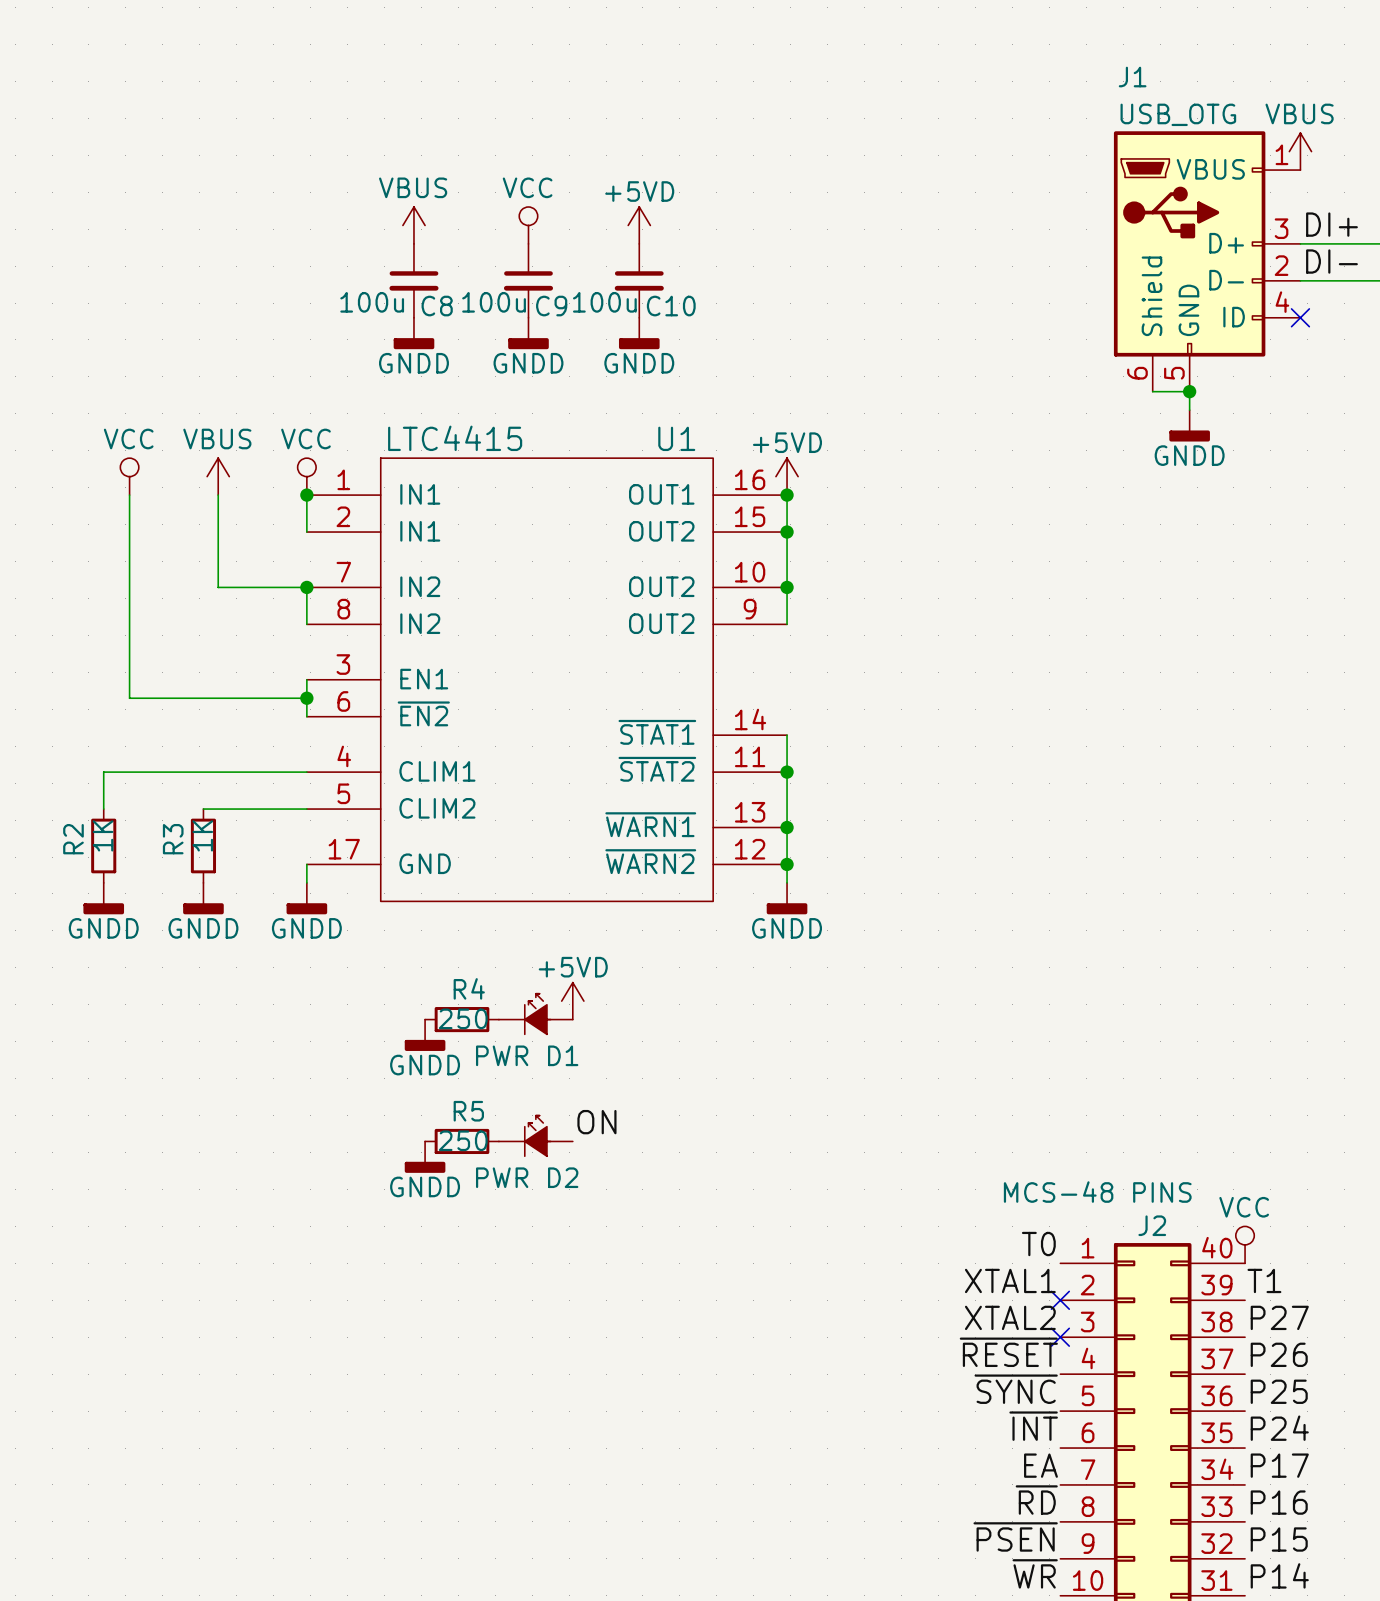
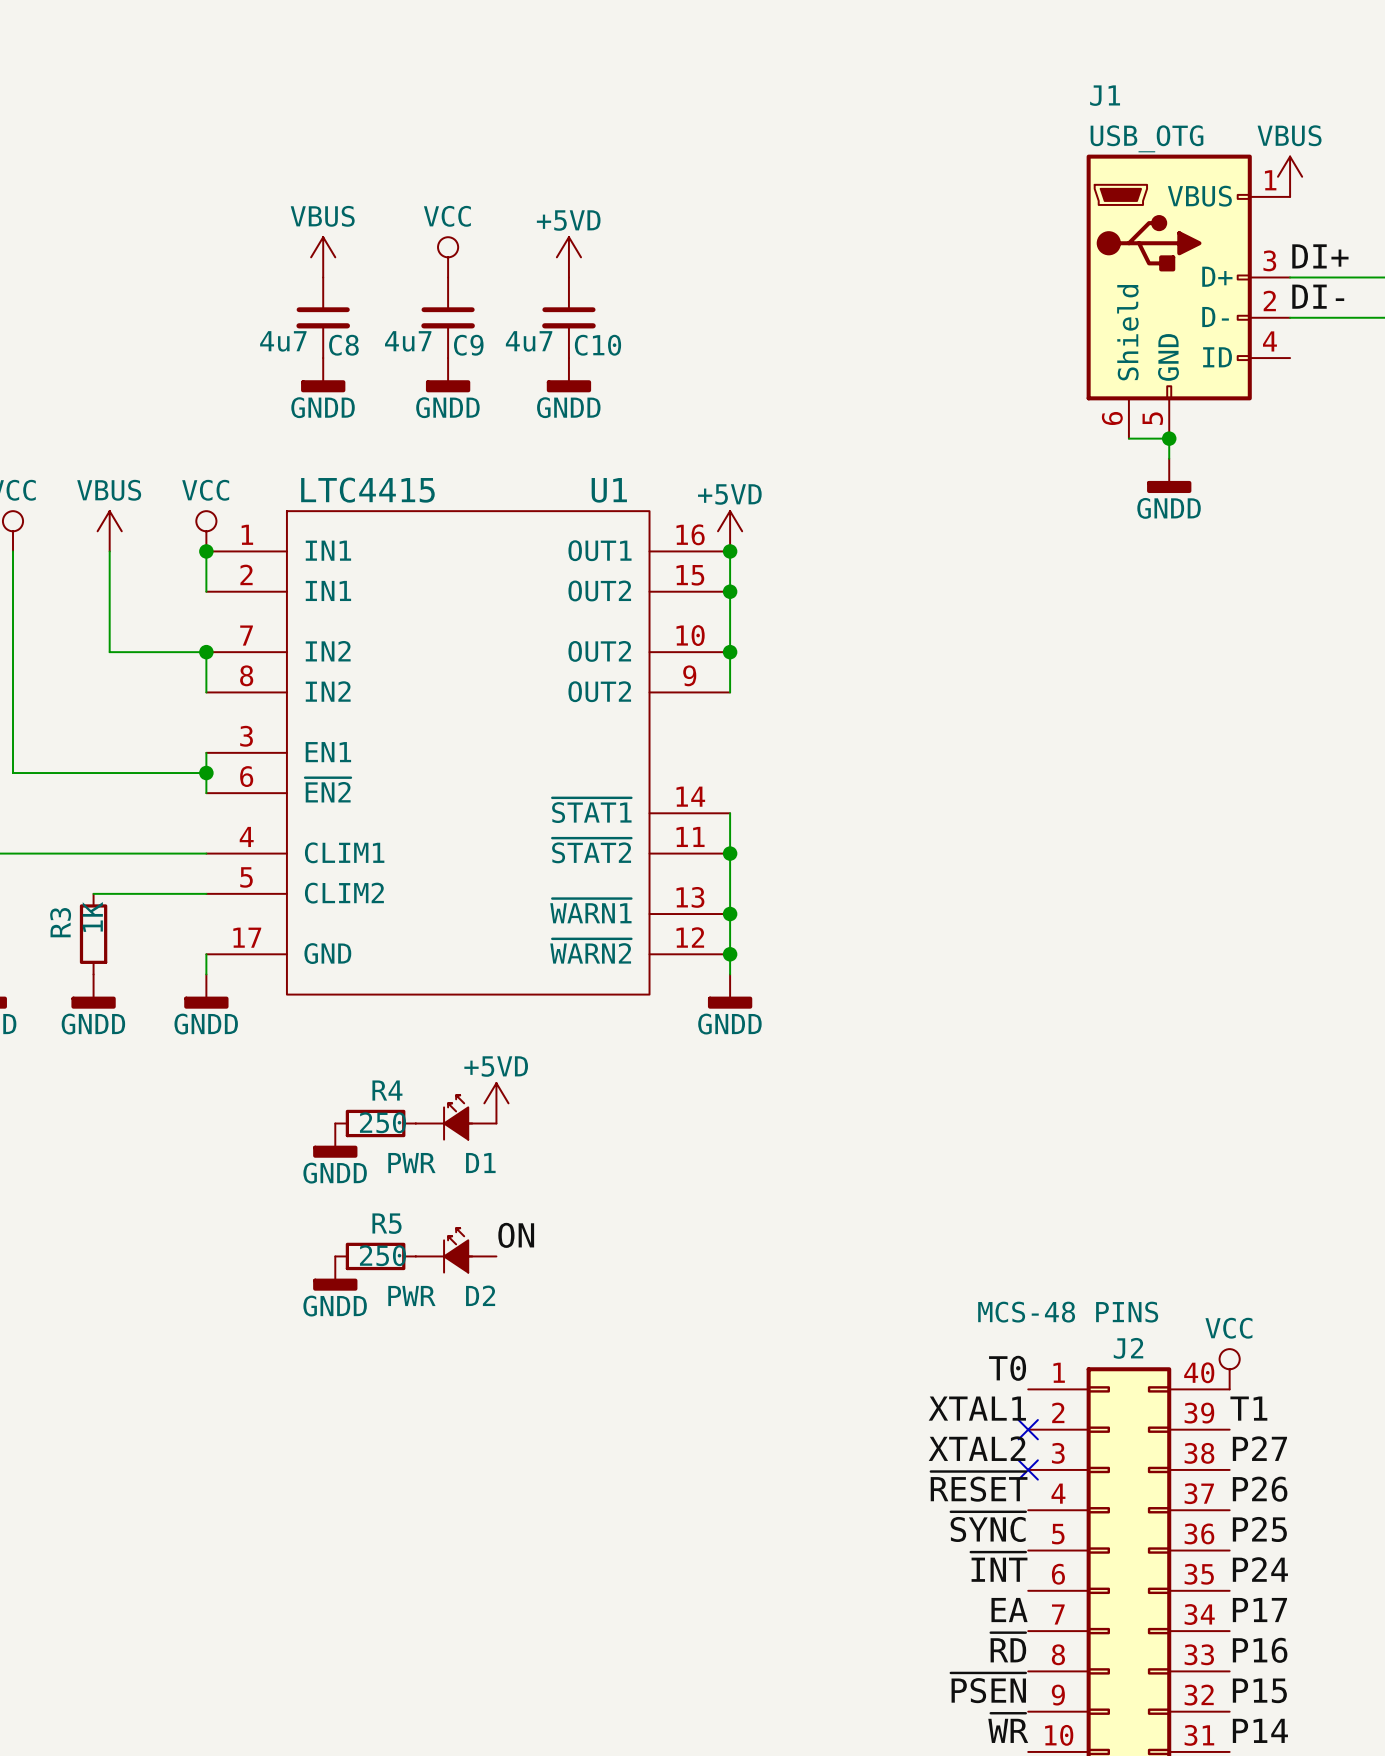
C8 value: 100u (372, 302) -> 4u7 (283, 341)
C9 value: 100u (494, 302) -> 4u7 (408, 341)
C10 value: 100u (604, 302) -> 4u7 (529, 341)
no-connect mark: (1300, 317) -> none

